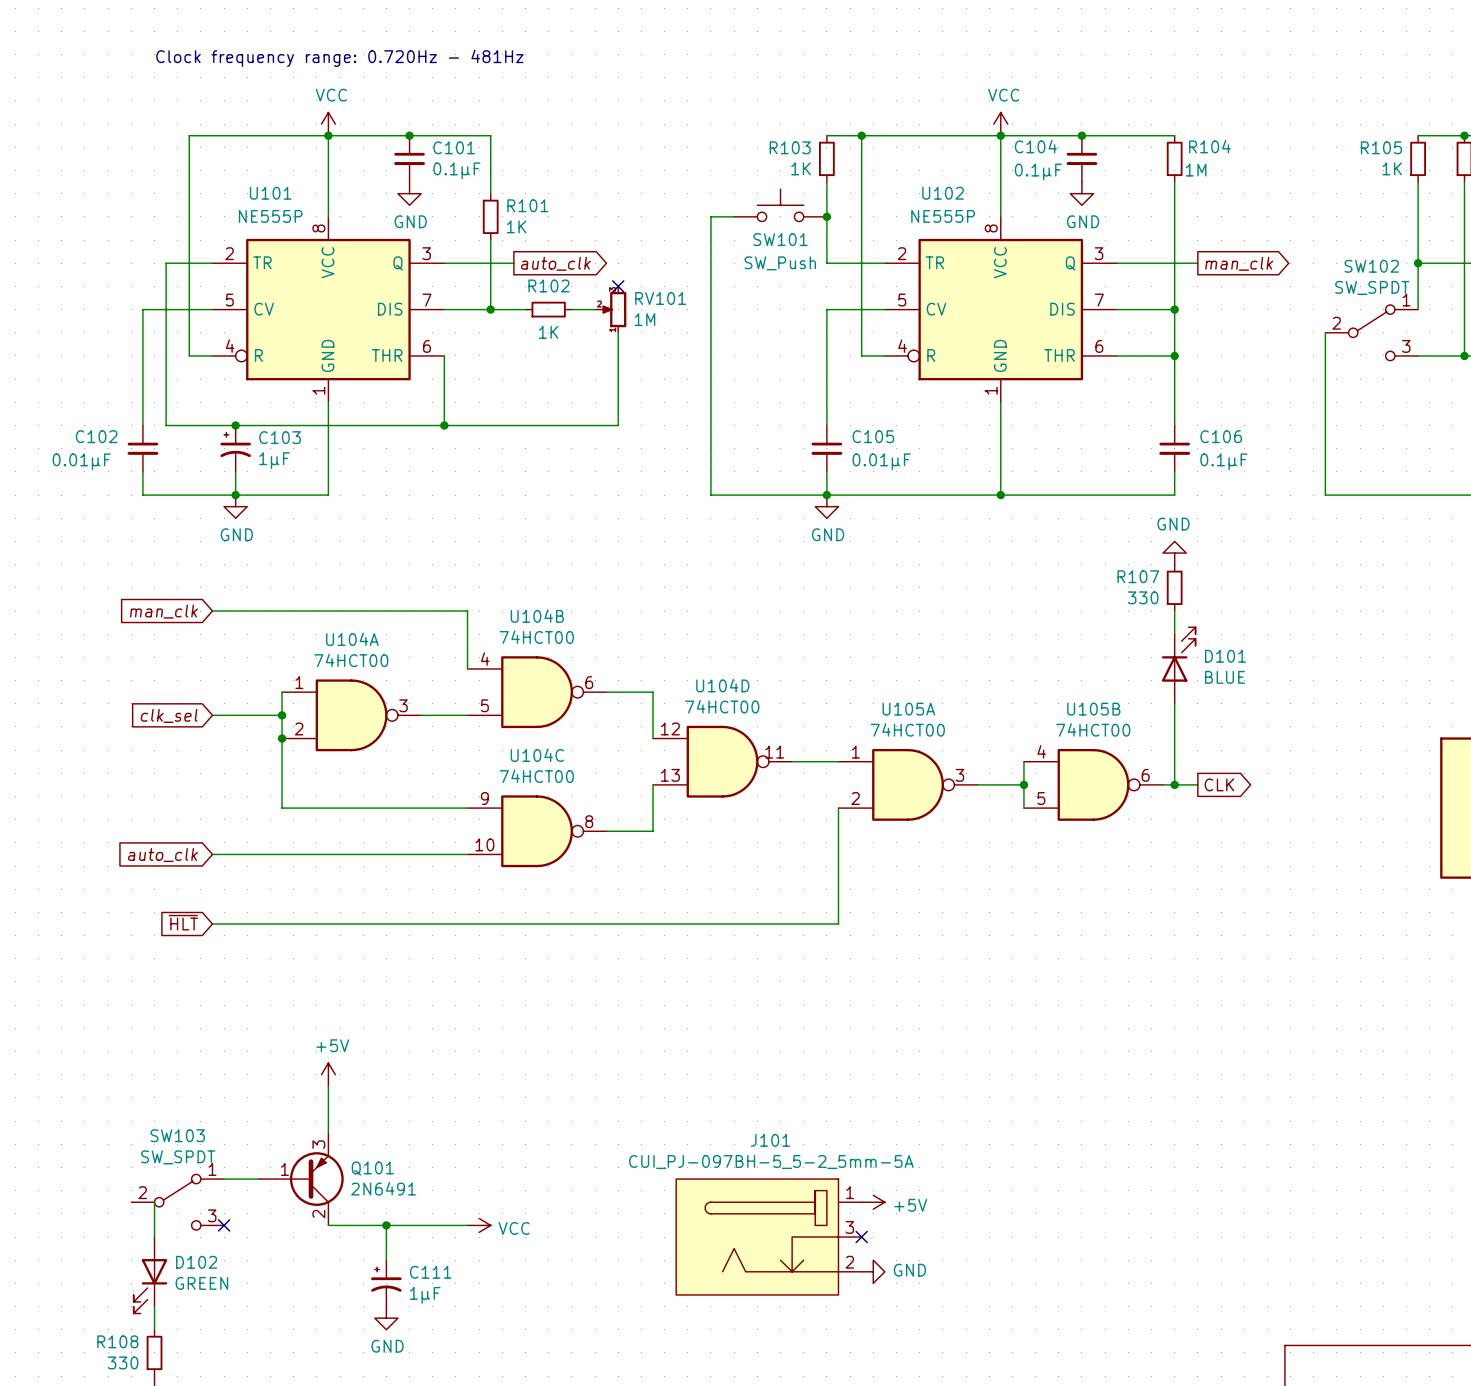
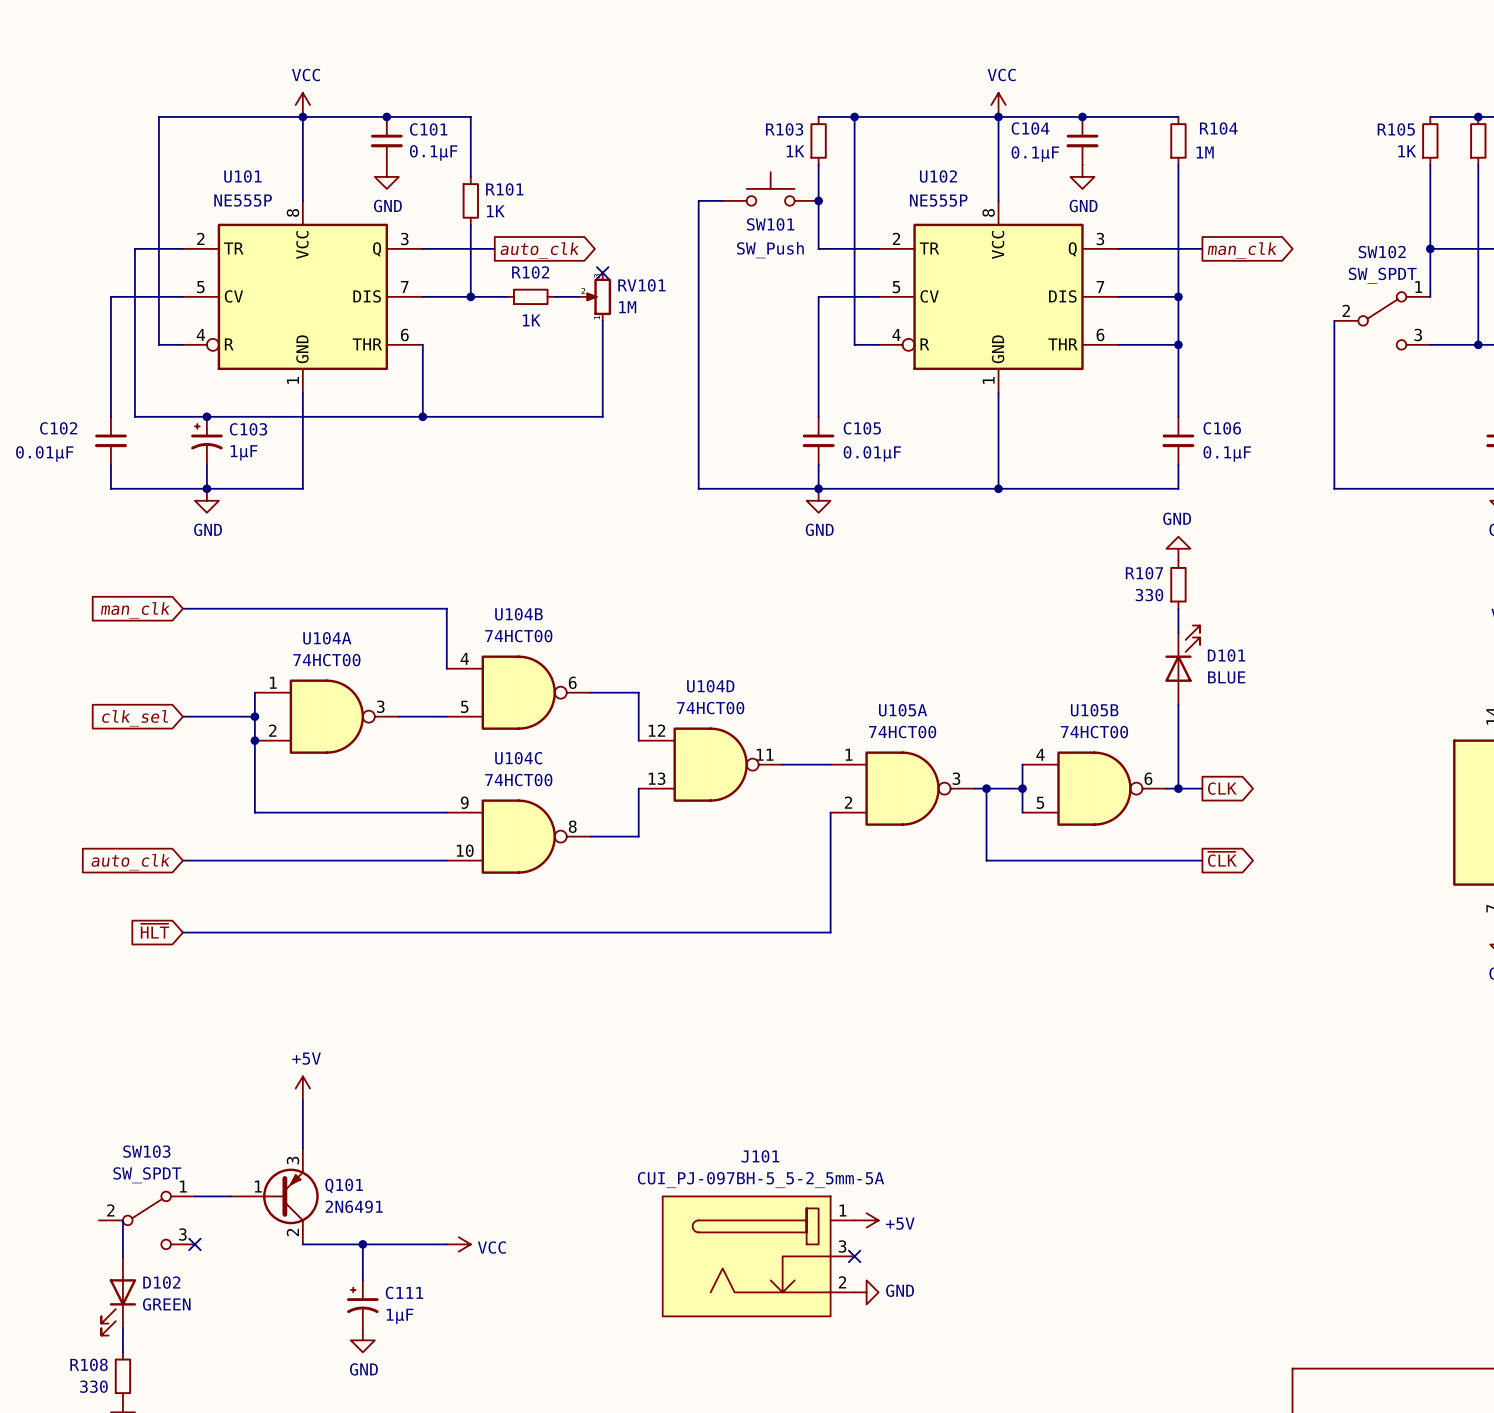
text: Clock frequency range: 0.720Hz - 481Hz (339, 58) -> none
wire: none -> (986, 788) (986, 860) (1202, 860)
junction: none -> (986, 788)
global label: none -> ~{CLK} (1222, 859)

